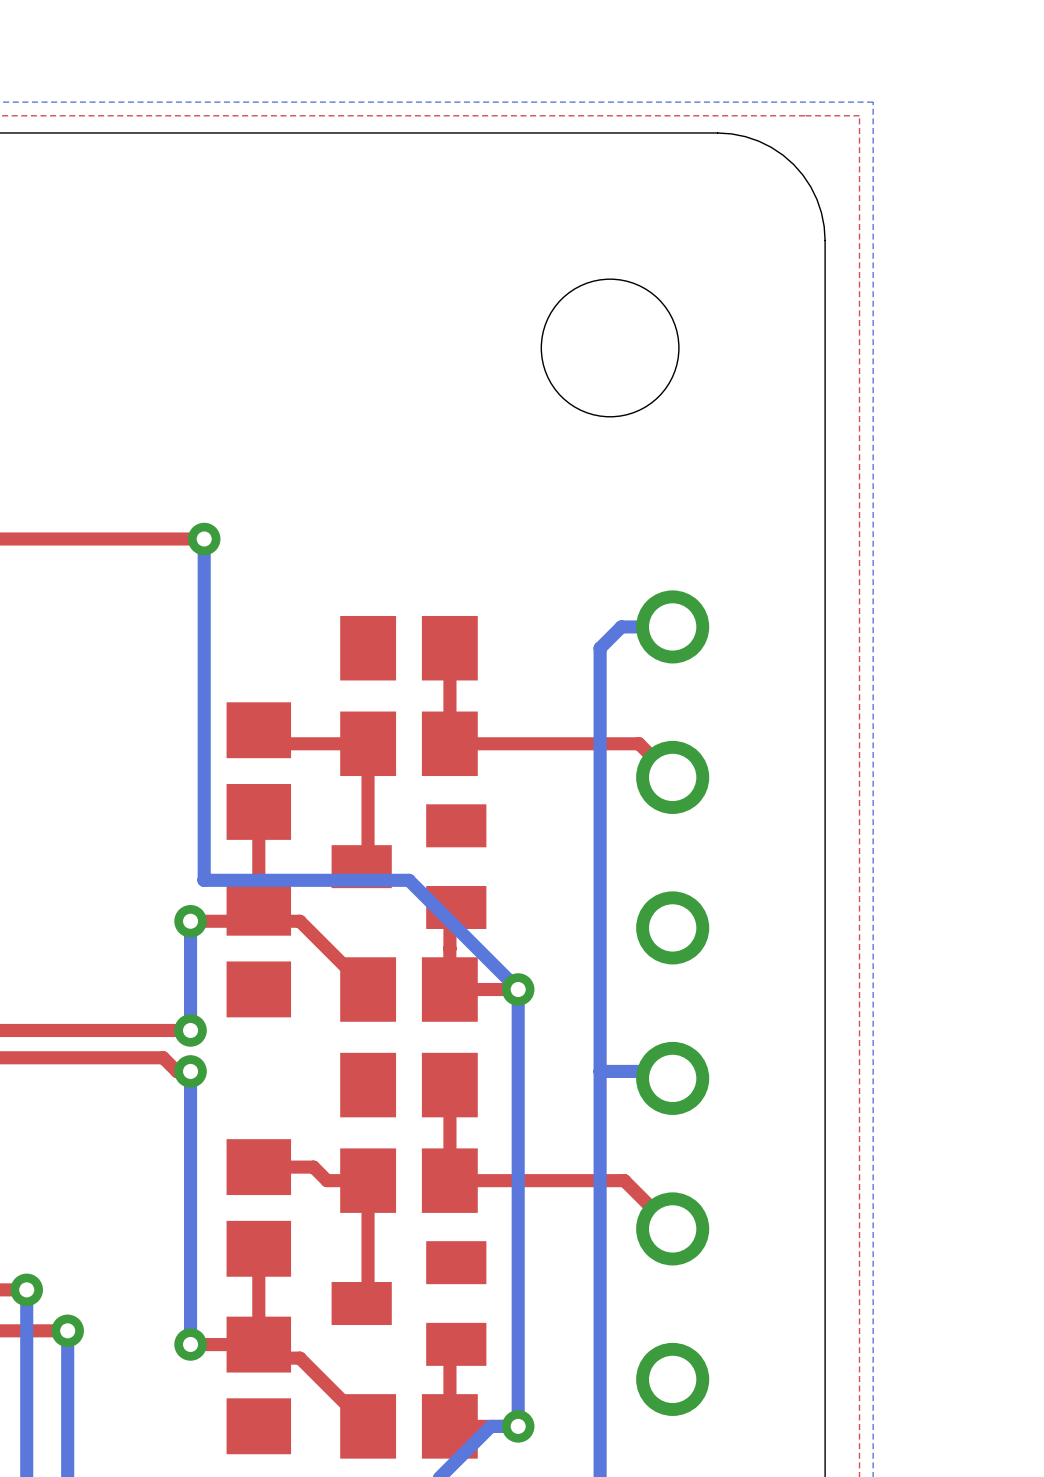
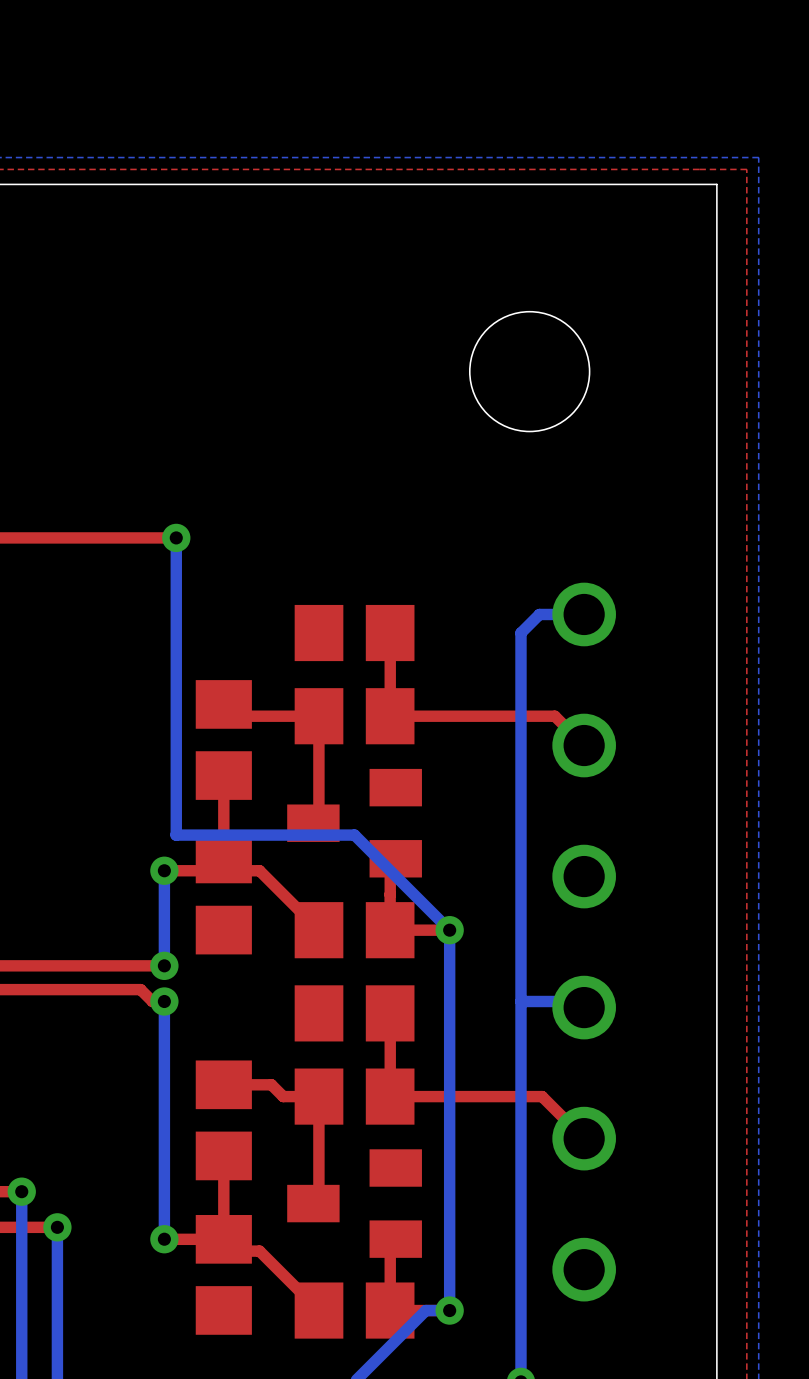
board edge: (717, 132) (731, 133) (758, 141) (771, 147) (793, 164) (810, 186) (816, 199) (824, 226) (825, 240) -> (623, 184) (716, 184) (716, 278)

